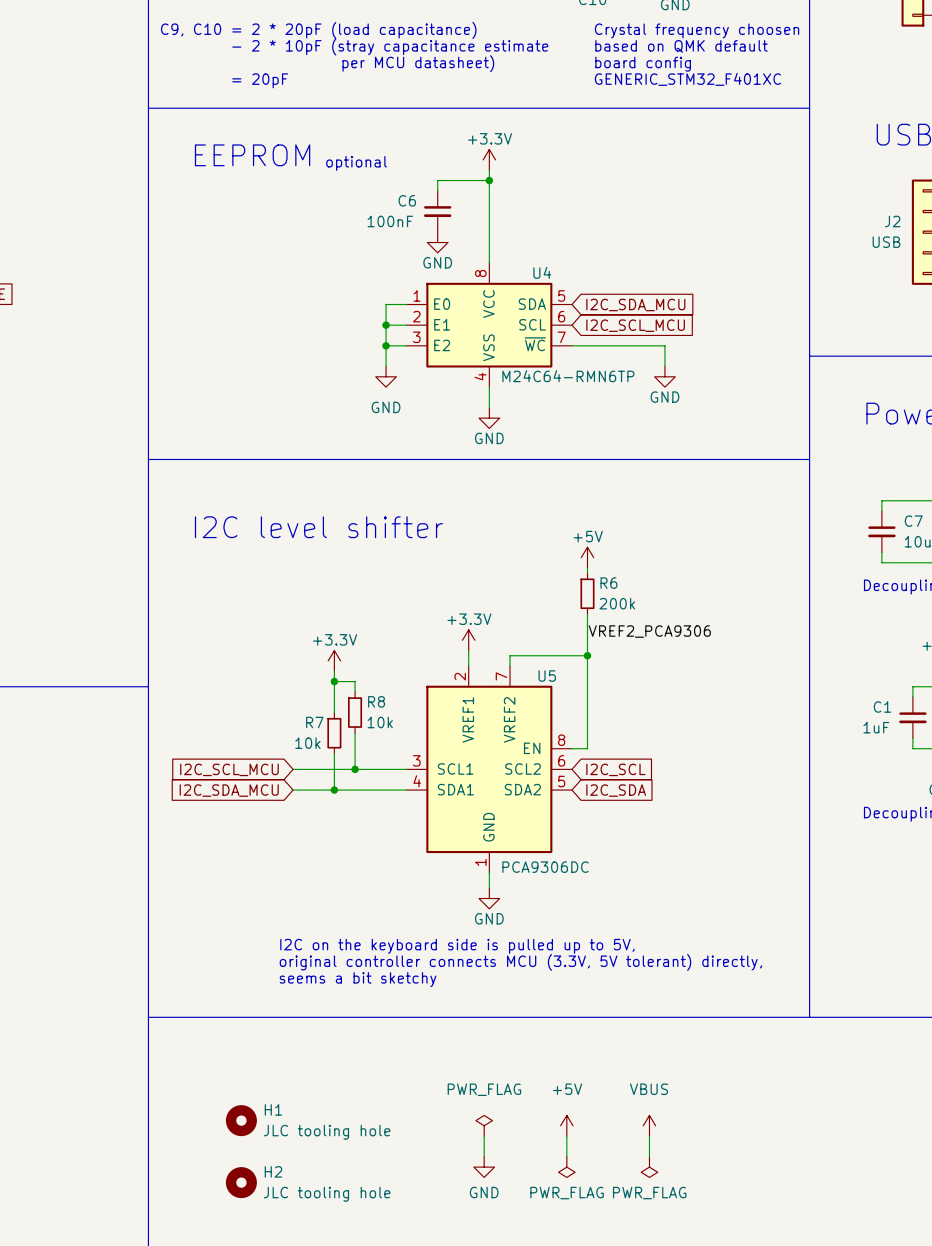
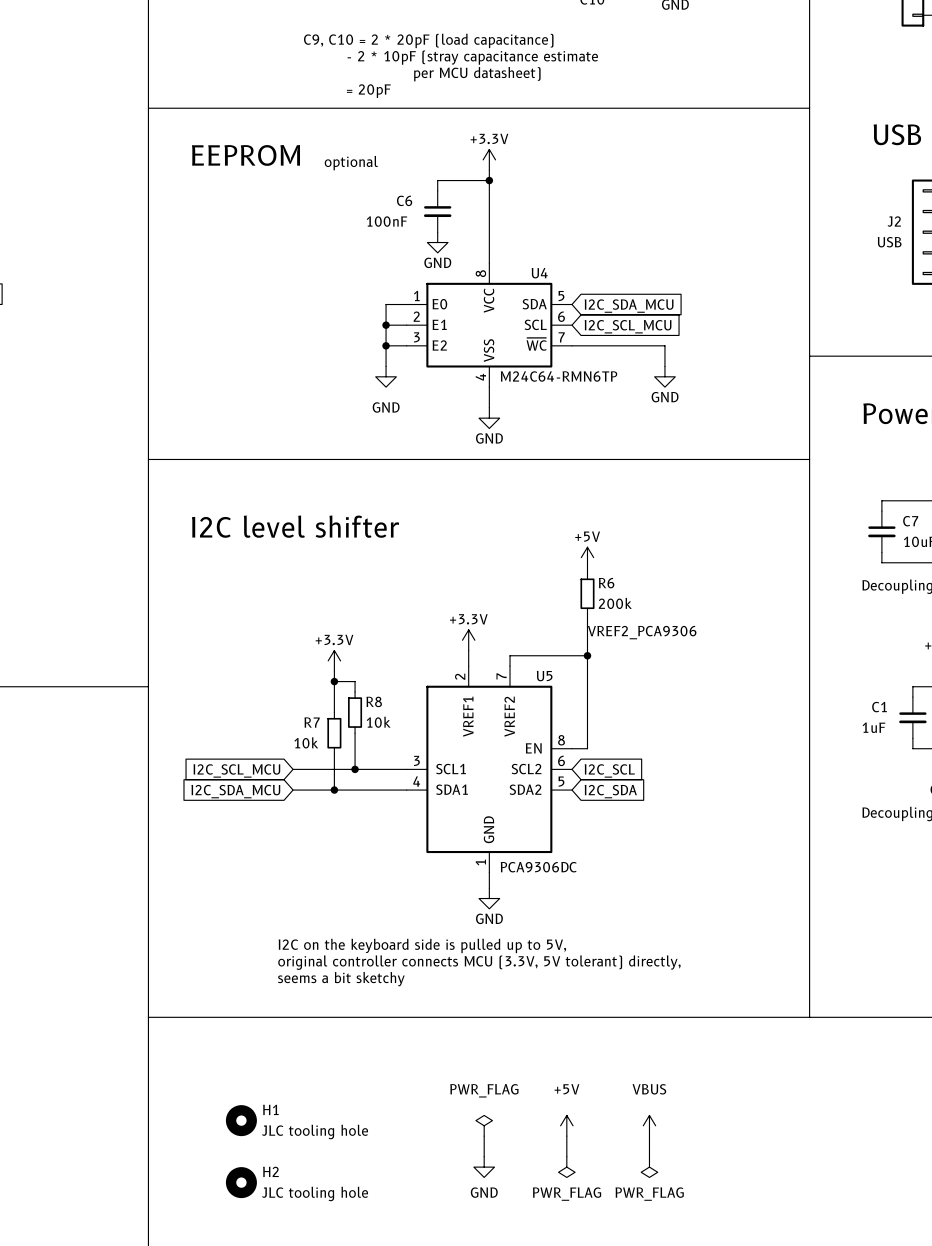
text position: C9, C10 = 2 * 20pF (load capacitance) (318, 30) -> C9, C10 = 2 * 20pF (load capacitance) (428, 40)
text: Crystal frequency choosen (697, 30) -> none
text: based on QMK default (681, 46) -> none
text position: - 2 * 10pF (stray capacitance estimate (390, 47) -> - 2 * 10pF (stray capacitance estimate (472, 57)
text position: per MCU datasheet) (418, 63) -> per MCU datasheet) (477, 74)
text: board config (643, 64) -> none
text: GENERIC_STM32_F401XC (687, 79) -> none
text position: = 20pF (260, 80) -> = 20pF (368, 91)

